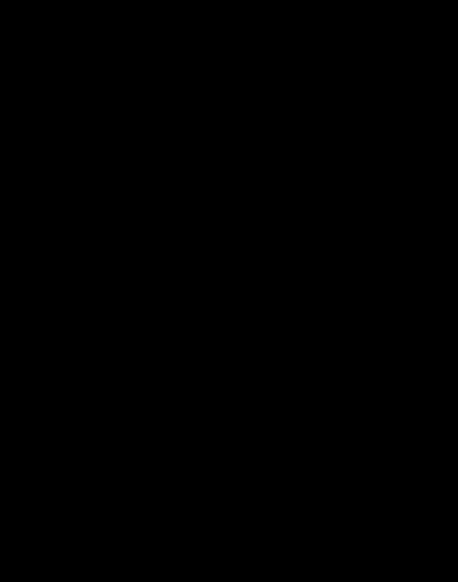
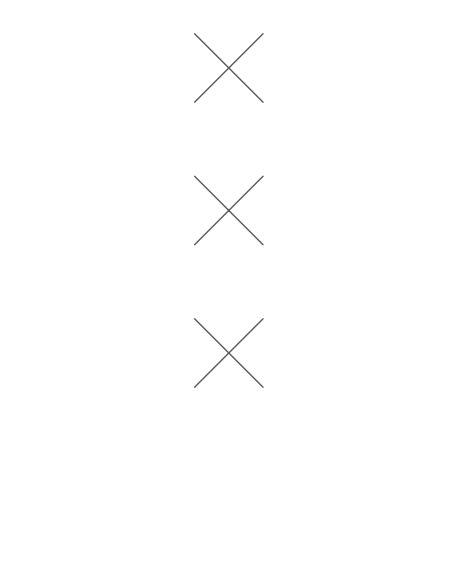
no-connect mark: none -> (228, 67)
no-connect mark: none -> (228, 210)
no-connect mark: none -> (228, 353)

